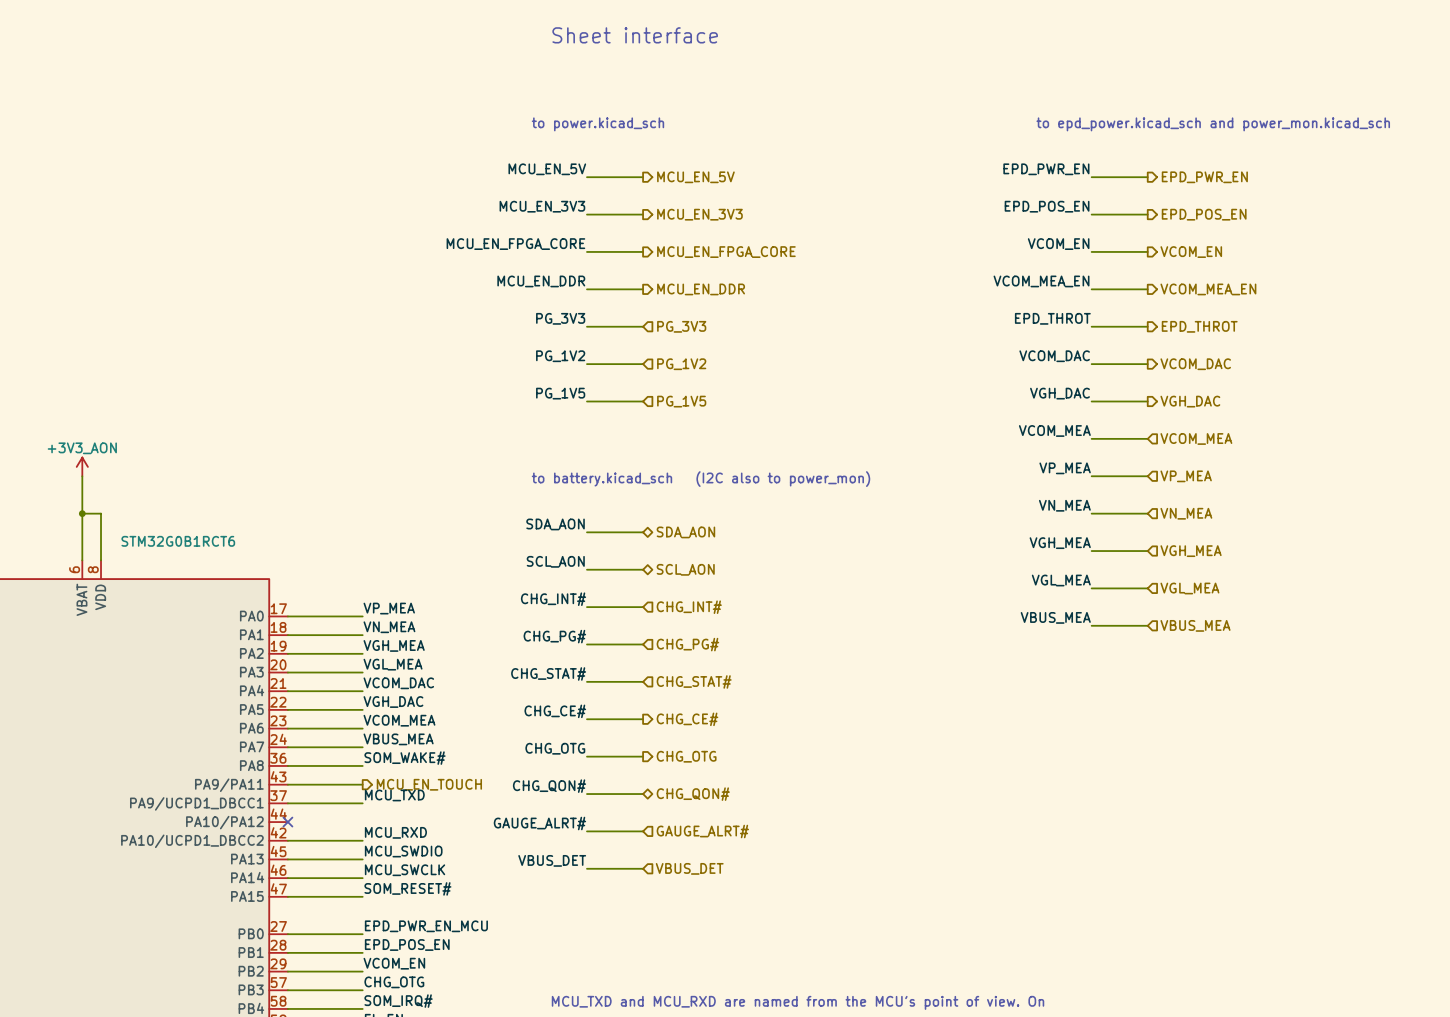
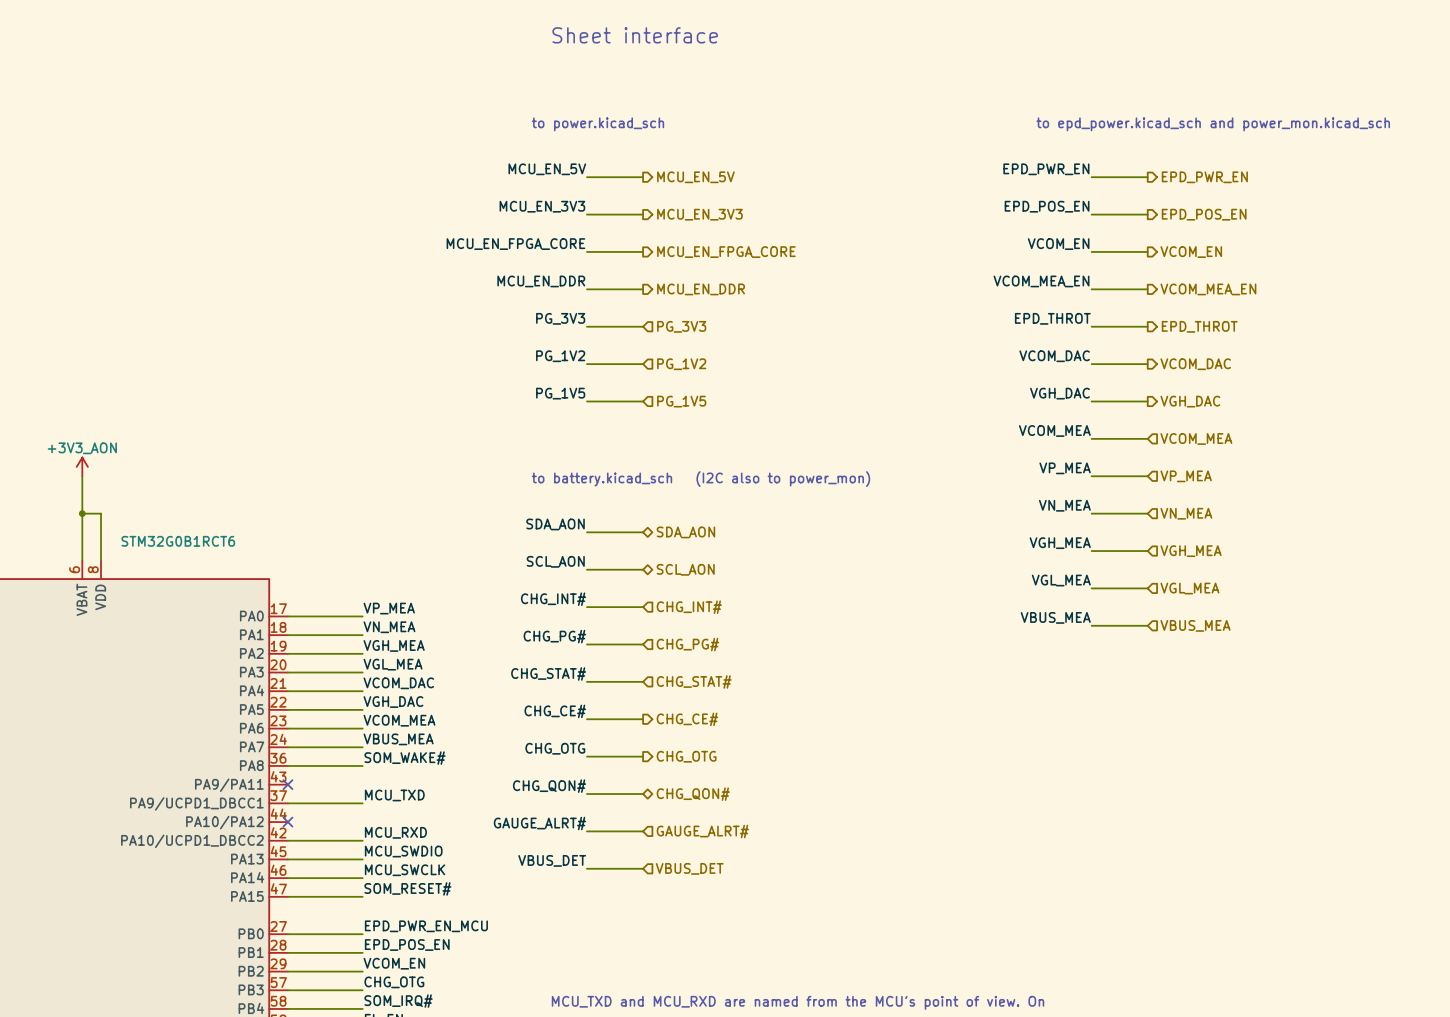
wire: (287, 784) (362, 784) -> none
no-connect mark: none -> (287, 784)
hierarchical label: MCU_EN_TOUCH (429, 784) -> none

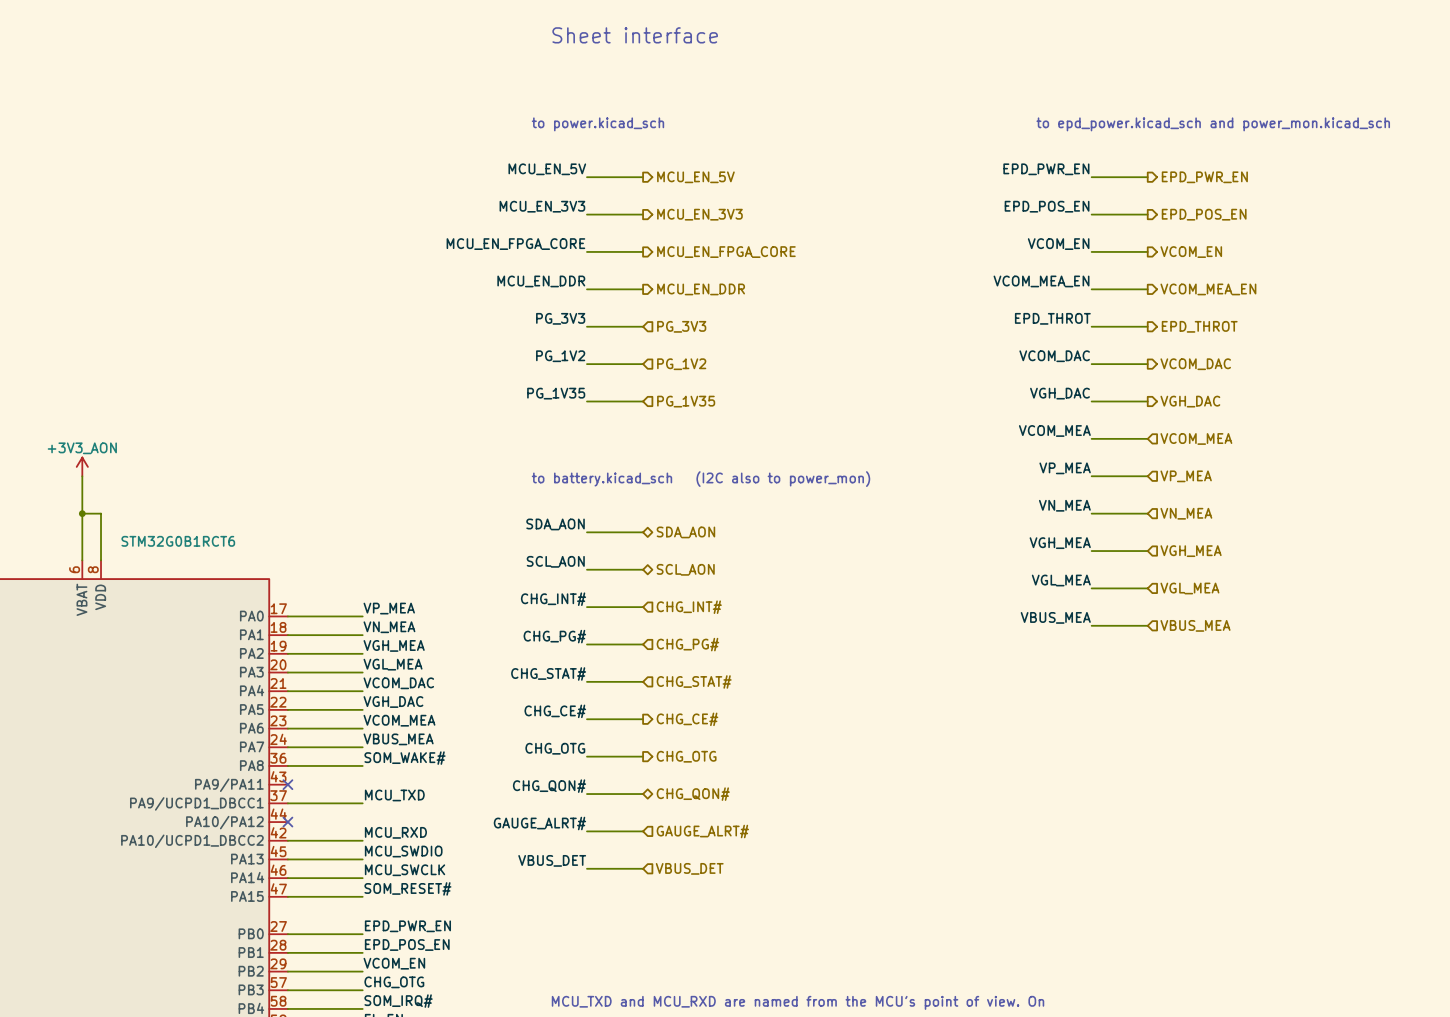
label: PG_1V5 (560, 393) -> PG_1V35 (556, 393)
hierarchical label: PG_1V5 (681, 401) -> PG_1V35 (686, 401)
label: EPD_PWR_EN_MCU (426, 926) -> EPD_PWR_EN (407, 926)

